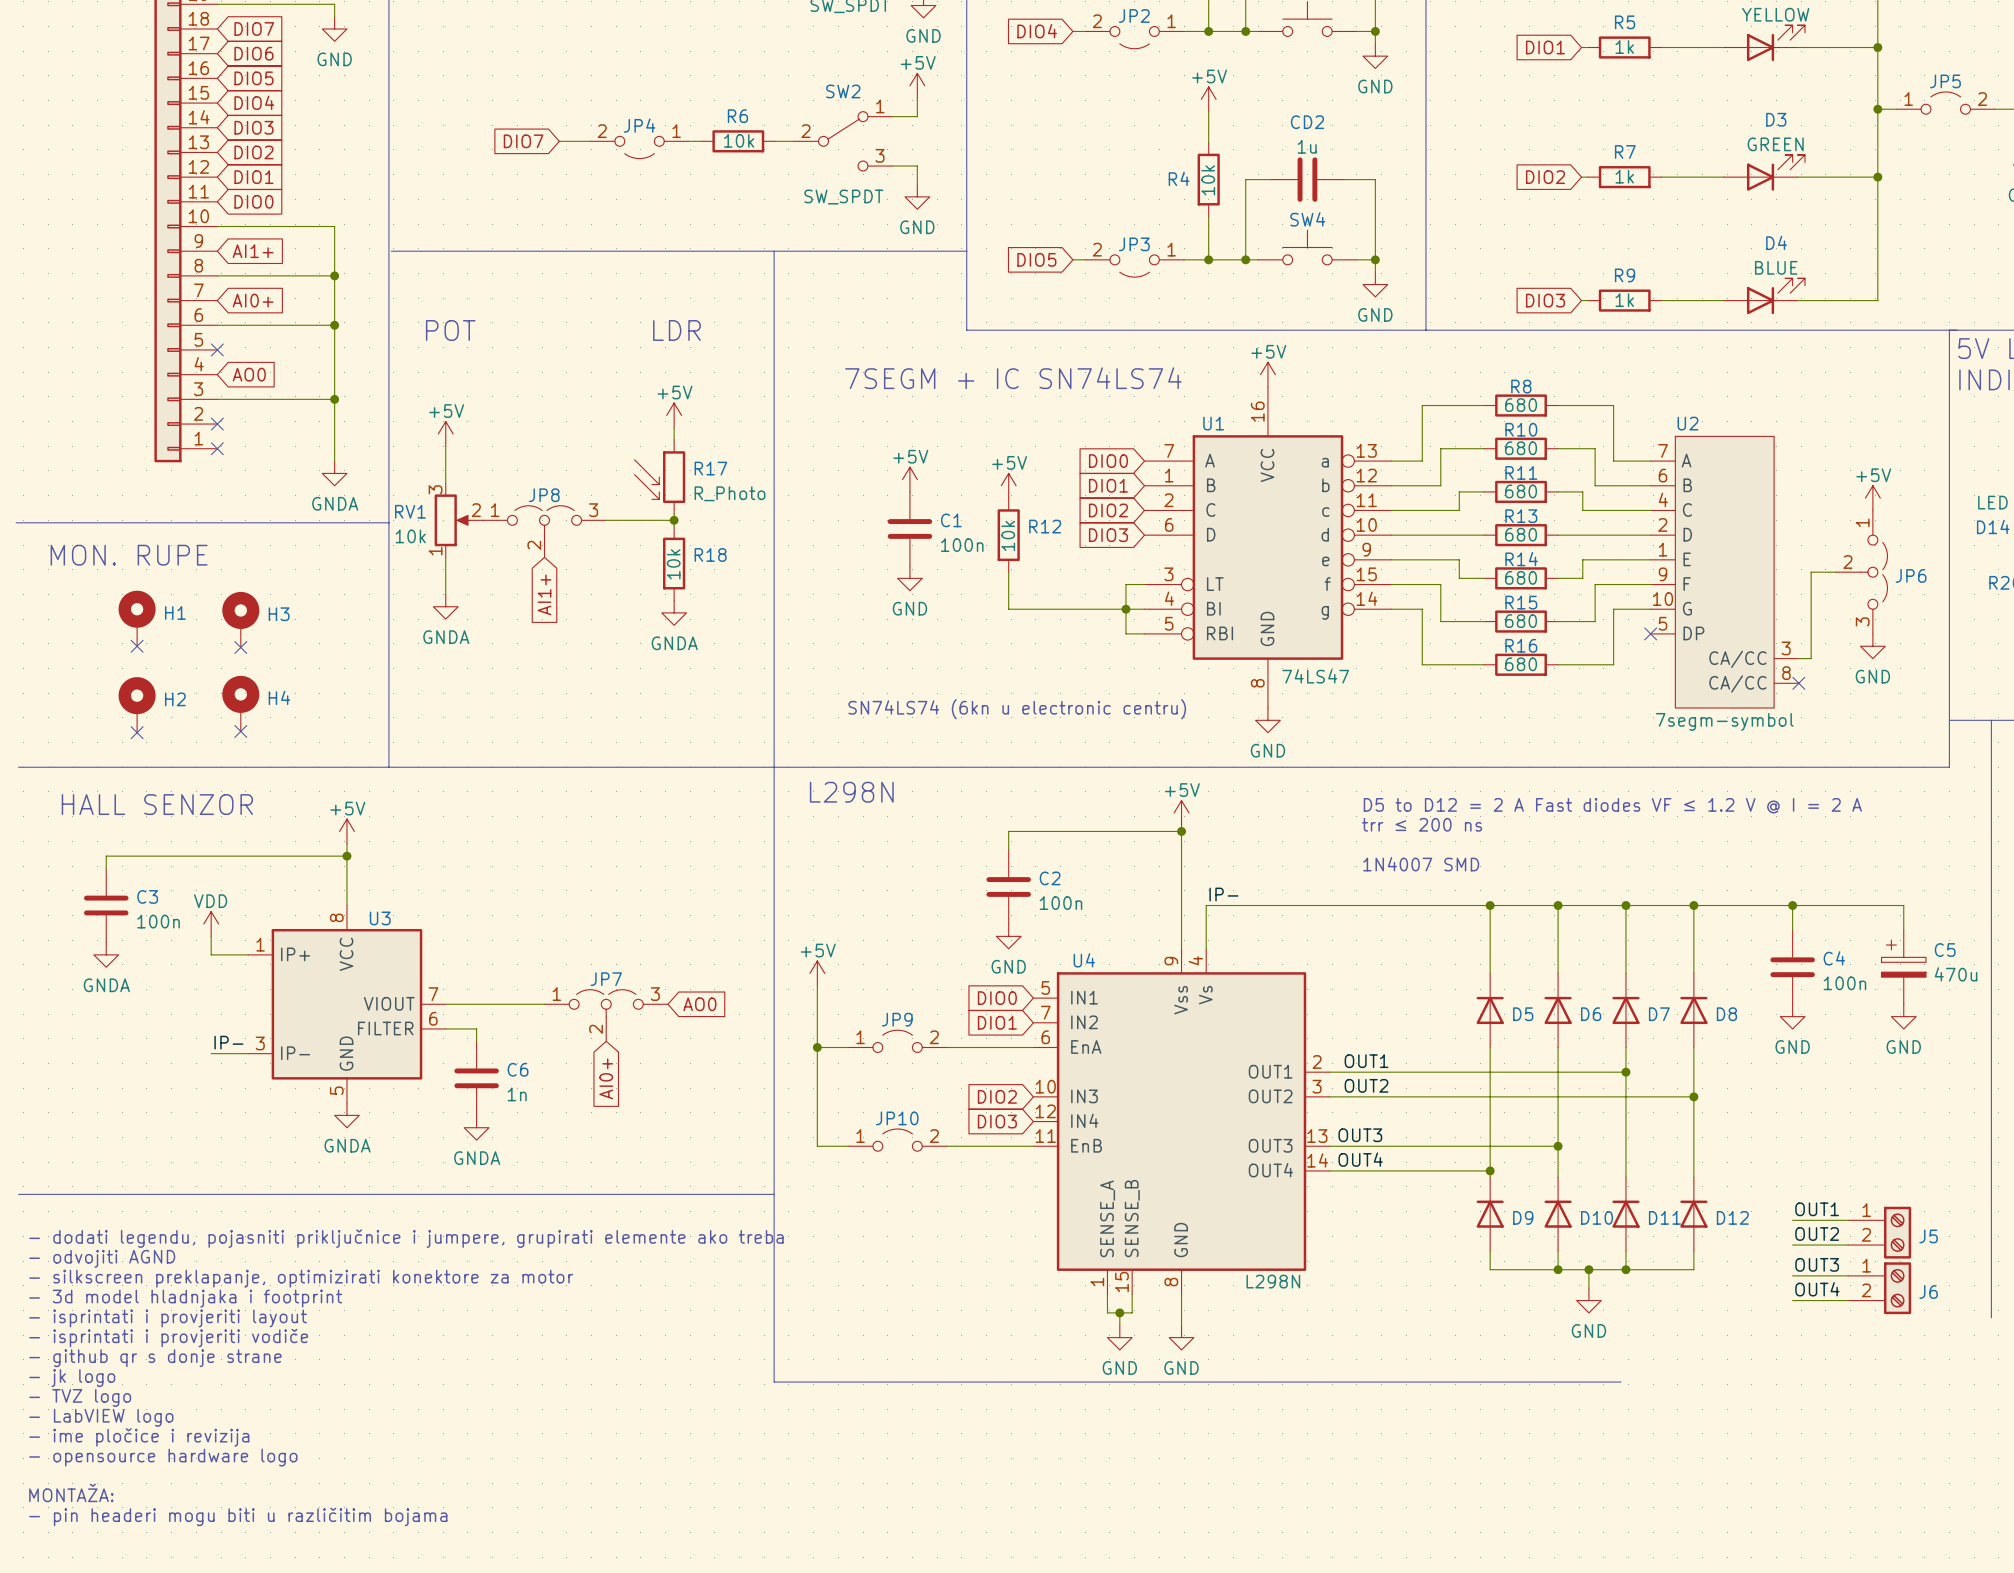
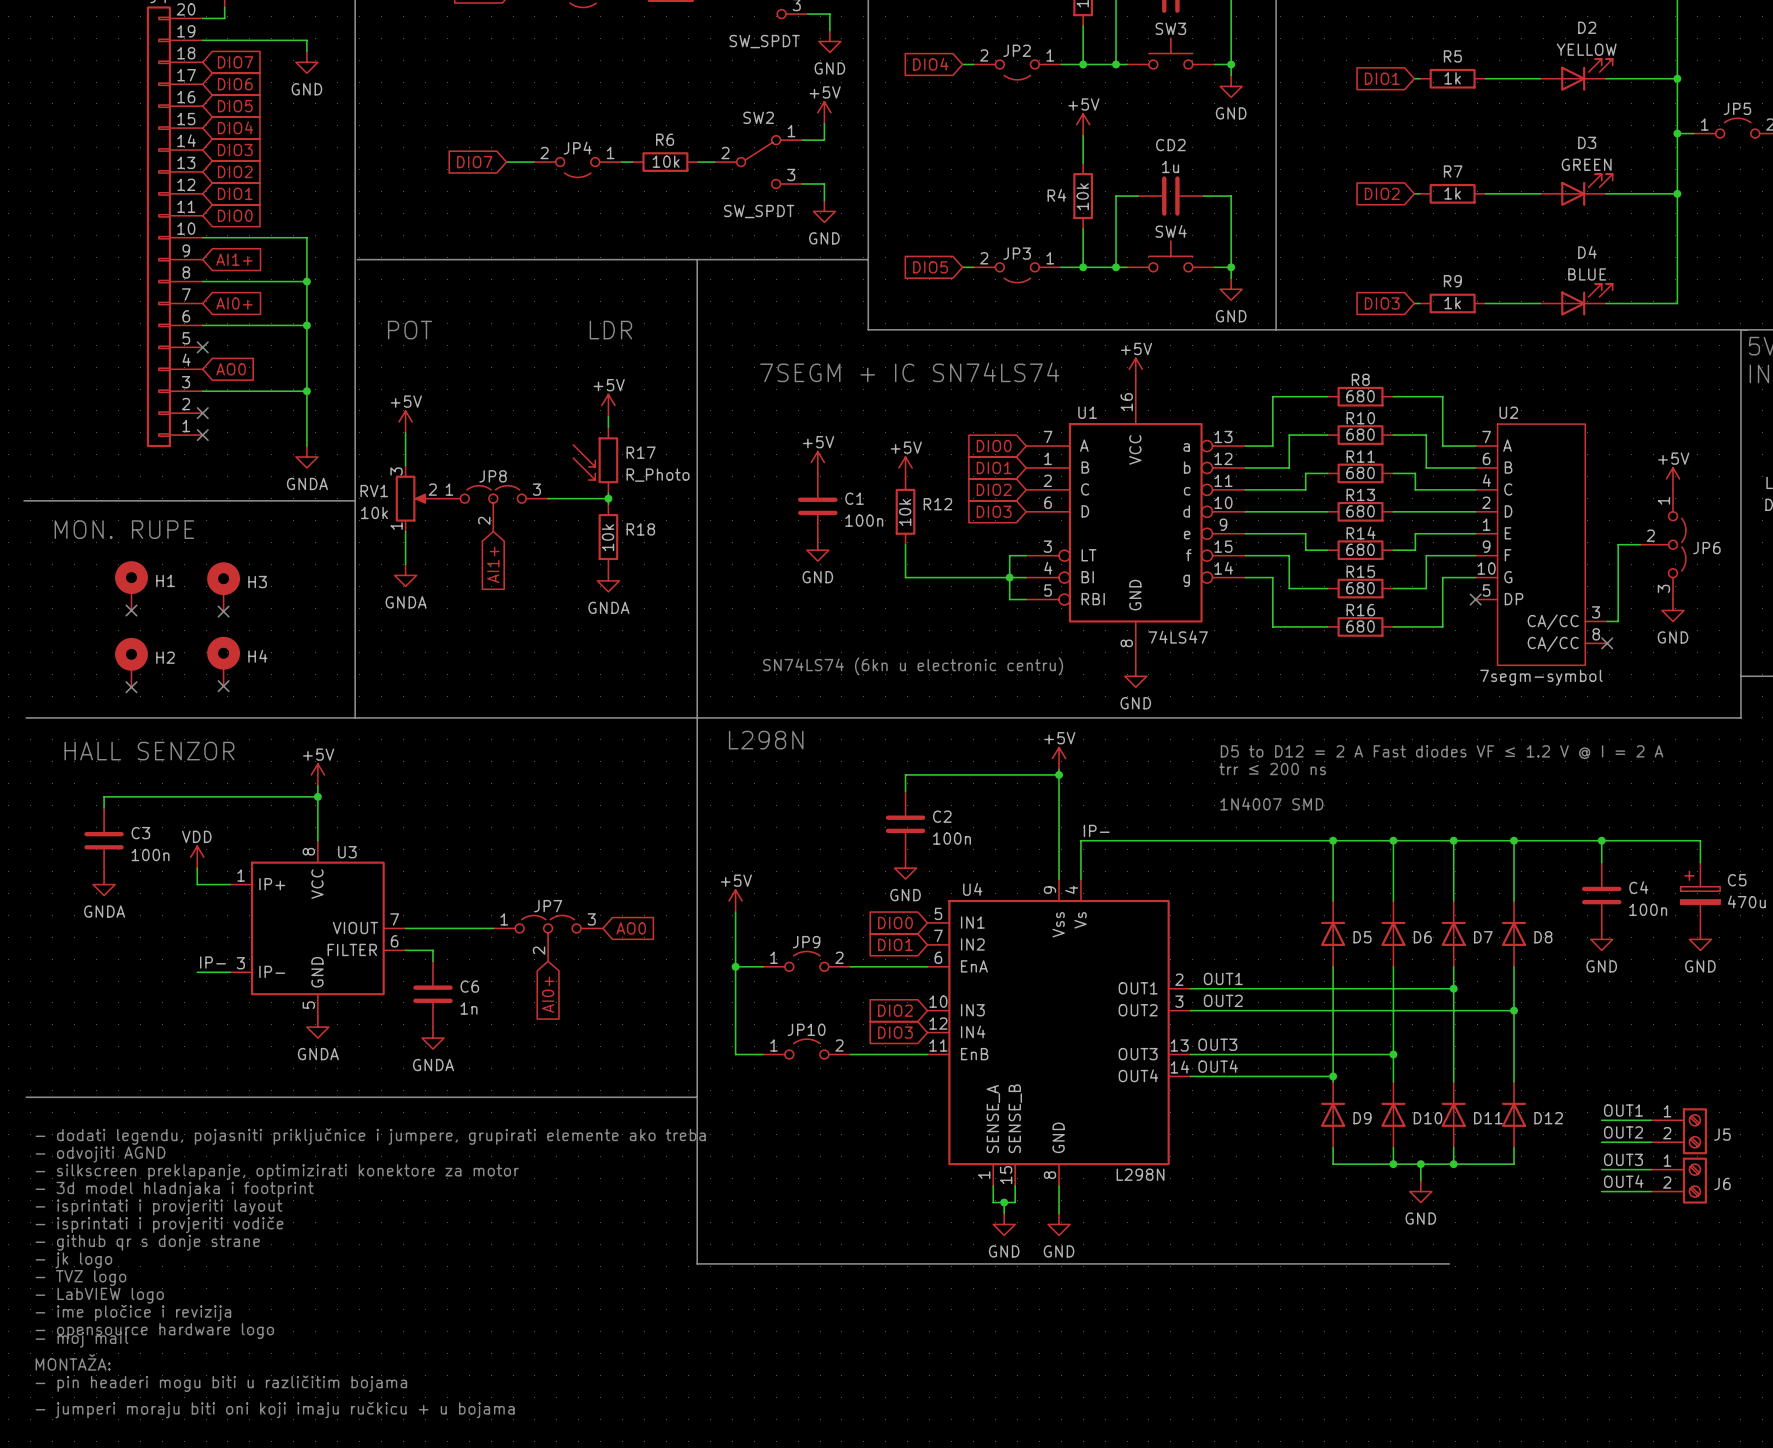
text: none -> - moj mail (81, 1339)
text: none -> - jumperi moraju biti oni koji imaju ručkicu + u bojama (275, 1410)

